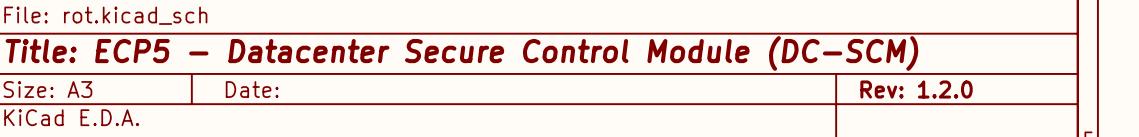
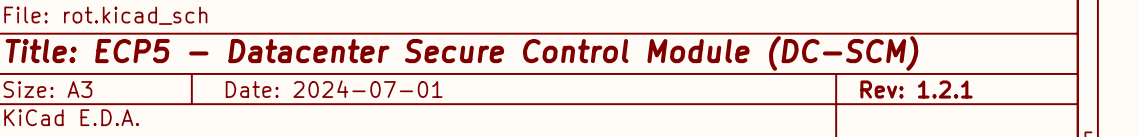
title block: Date: (252, 89) -> Date: 2024-07-01 (334, 89)
title block: Rev: 1.2.0 (916, 89) -> Rev: 1.2.1 (916, 89)

